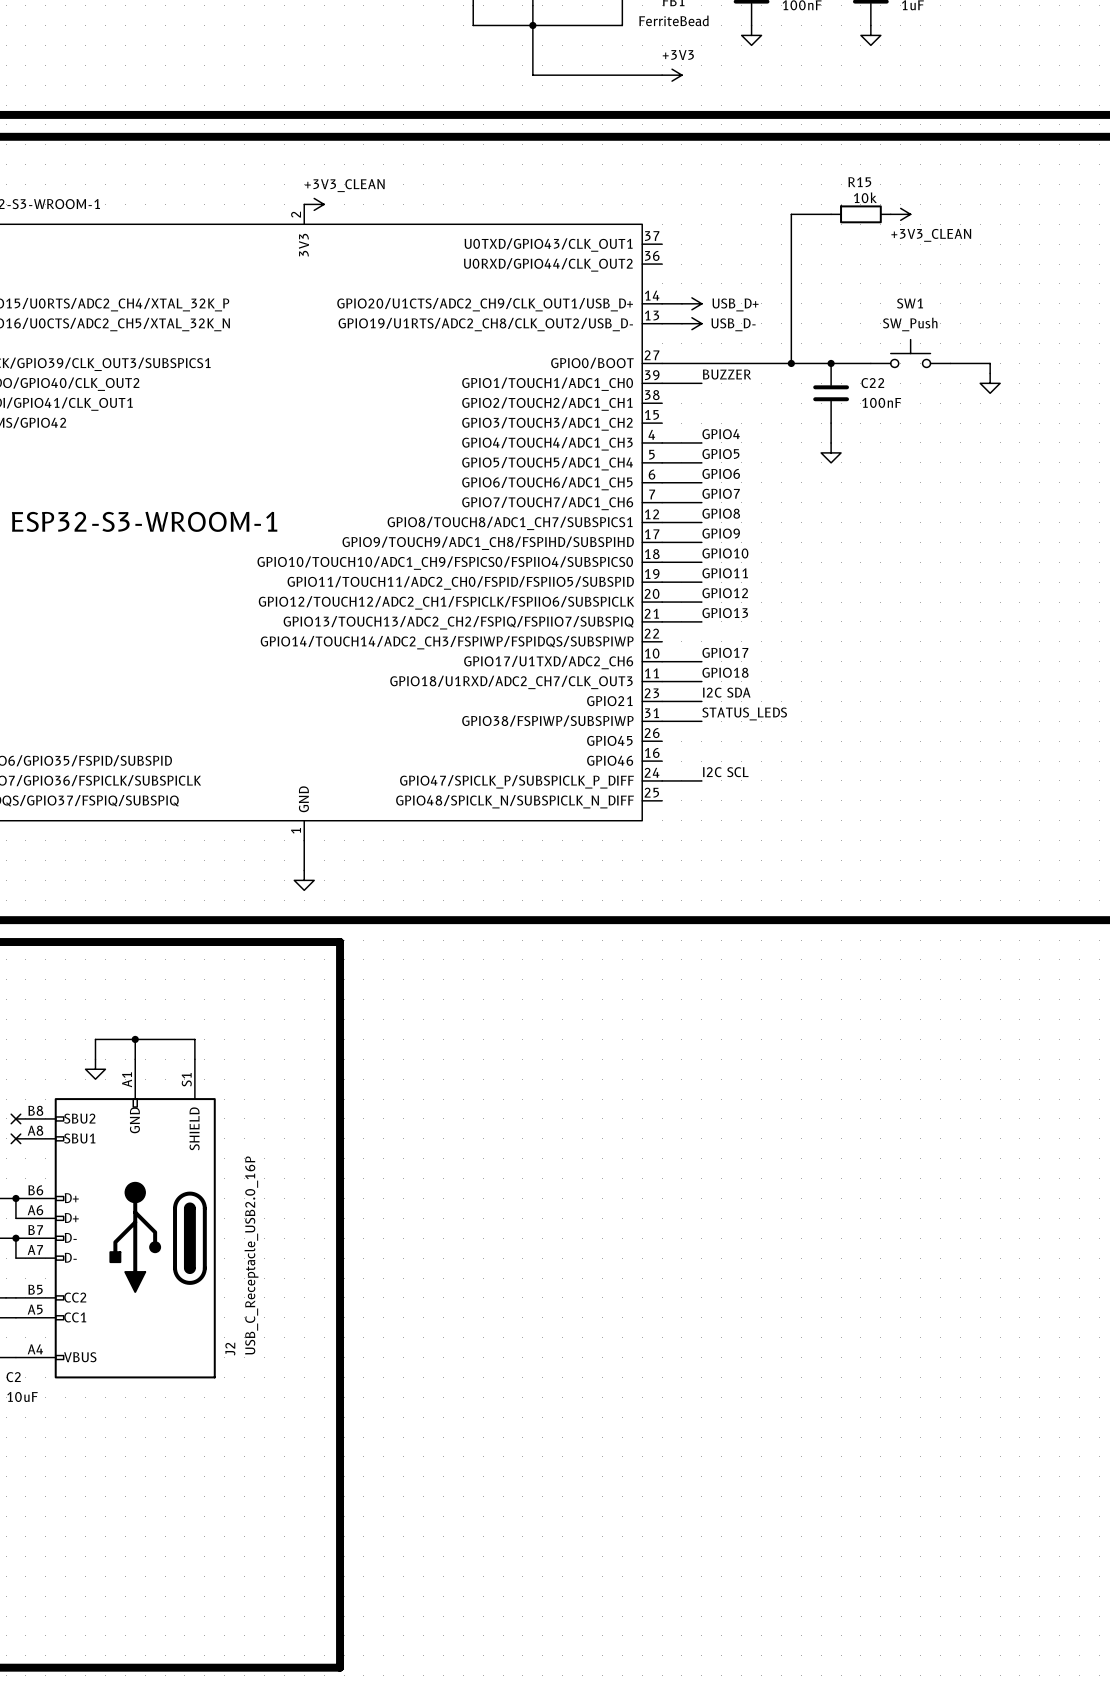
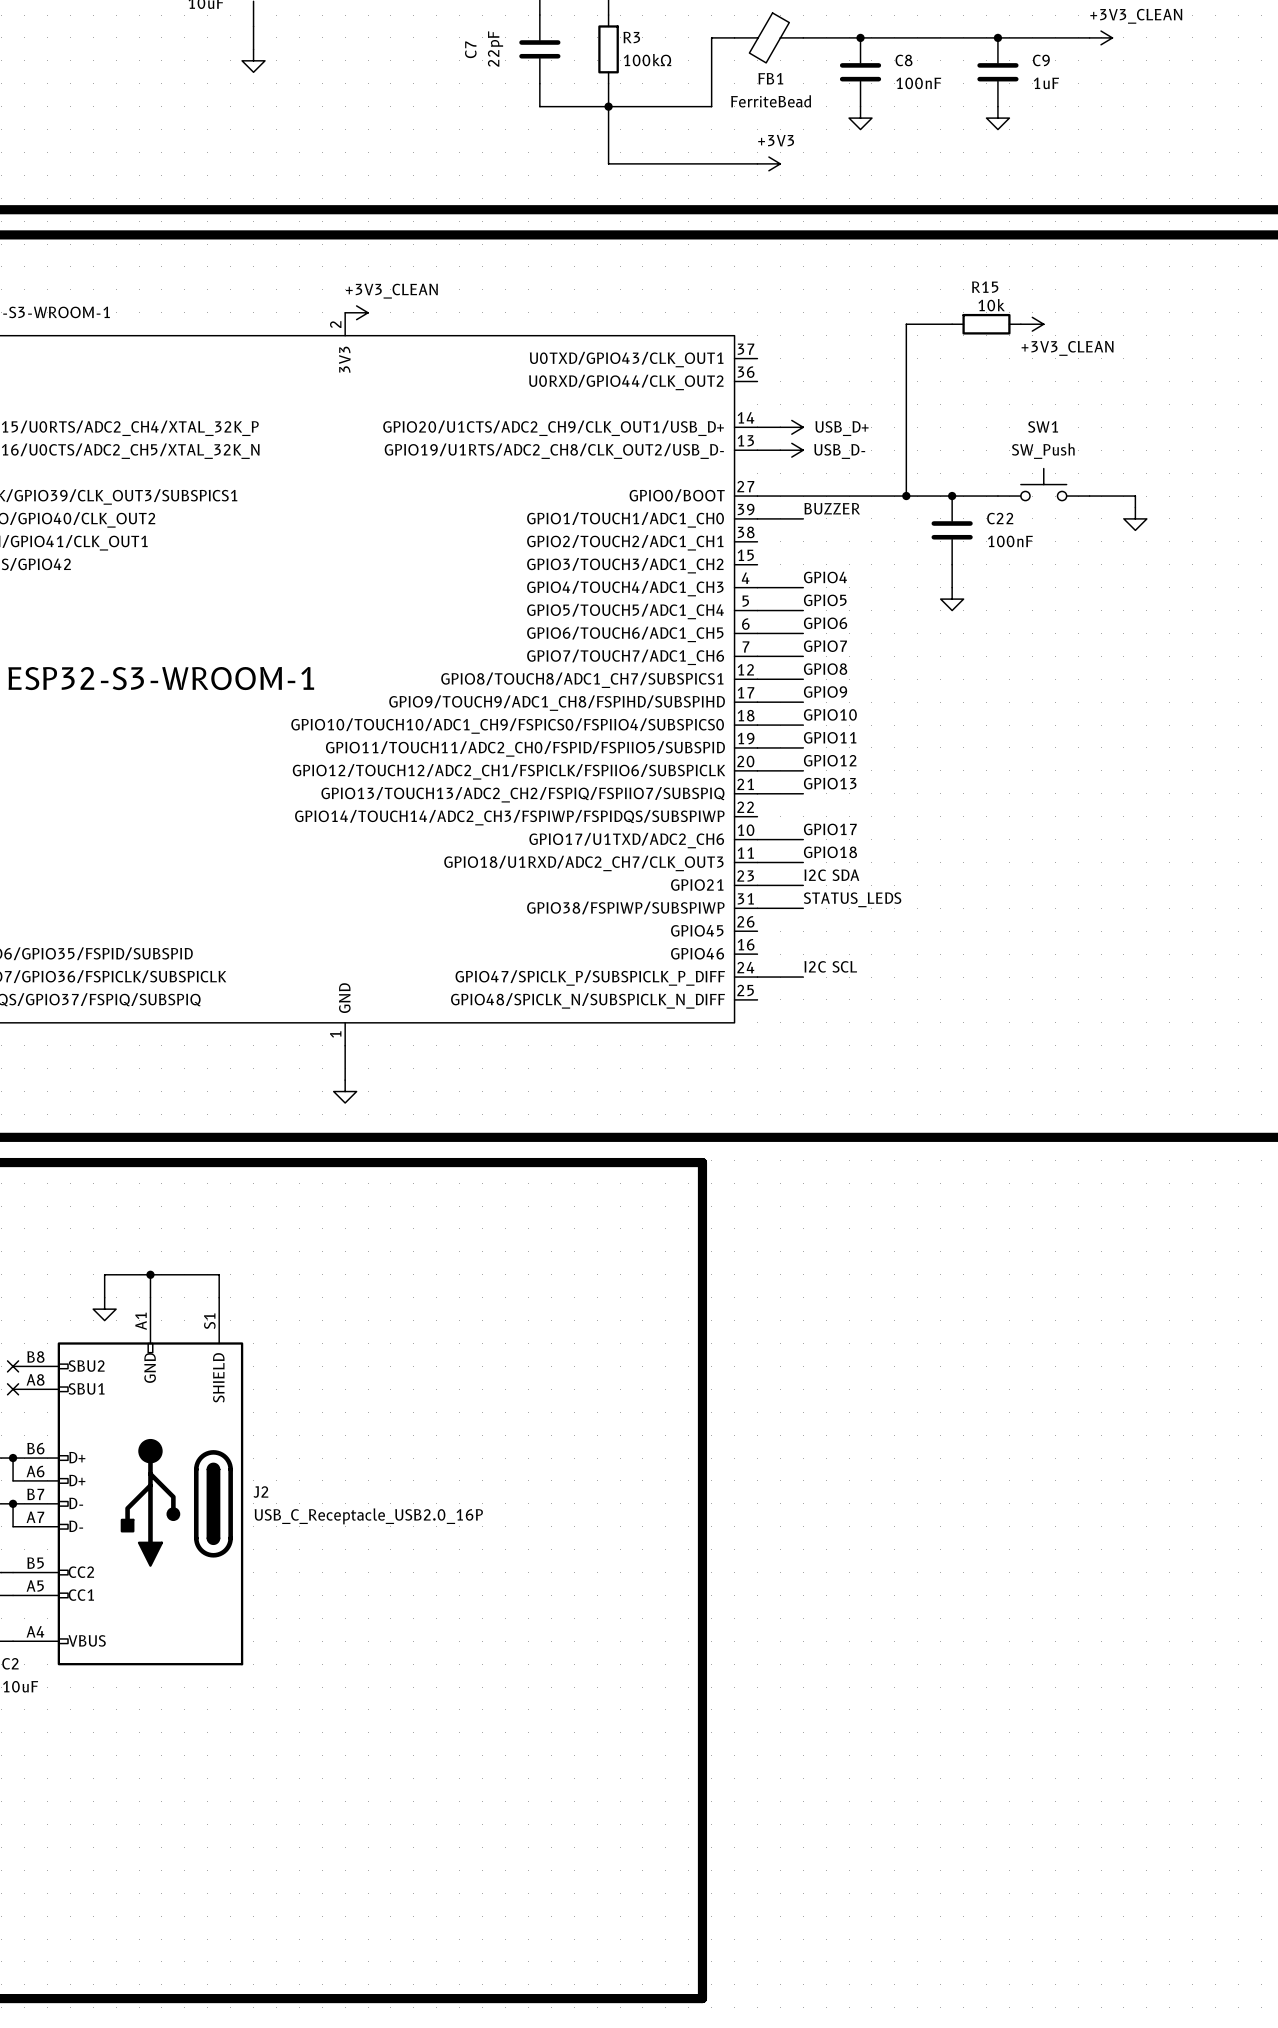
line: (340, 942) (340, 1667) -> (386, 1162) (702, 1162) (702, 1998) (386, 1998)
J2 value rotation: 0° (251, 1255) -> 90° clockwise (368, 1516)
J2 name rotation: 0° (230, 1349) -> 90° clockwise (260, 1492)
J2 name position: J2 (230, 1349) -> J2 (260, 1492)

